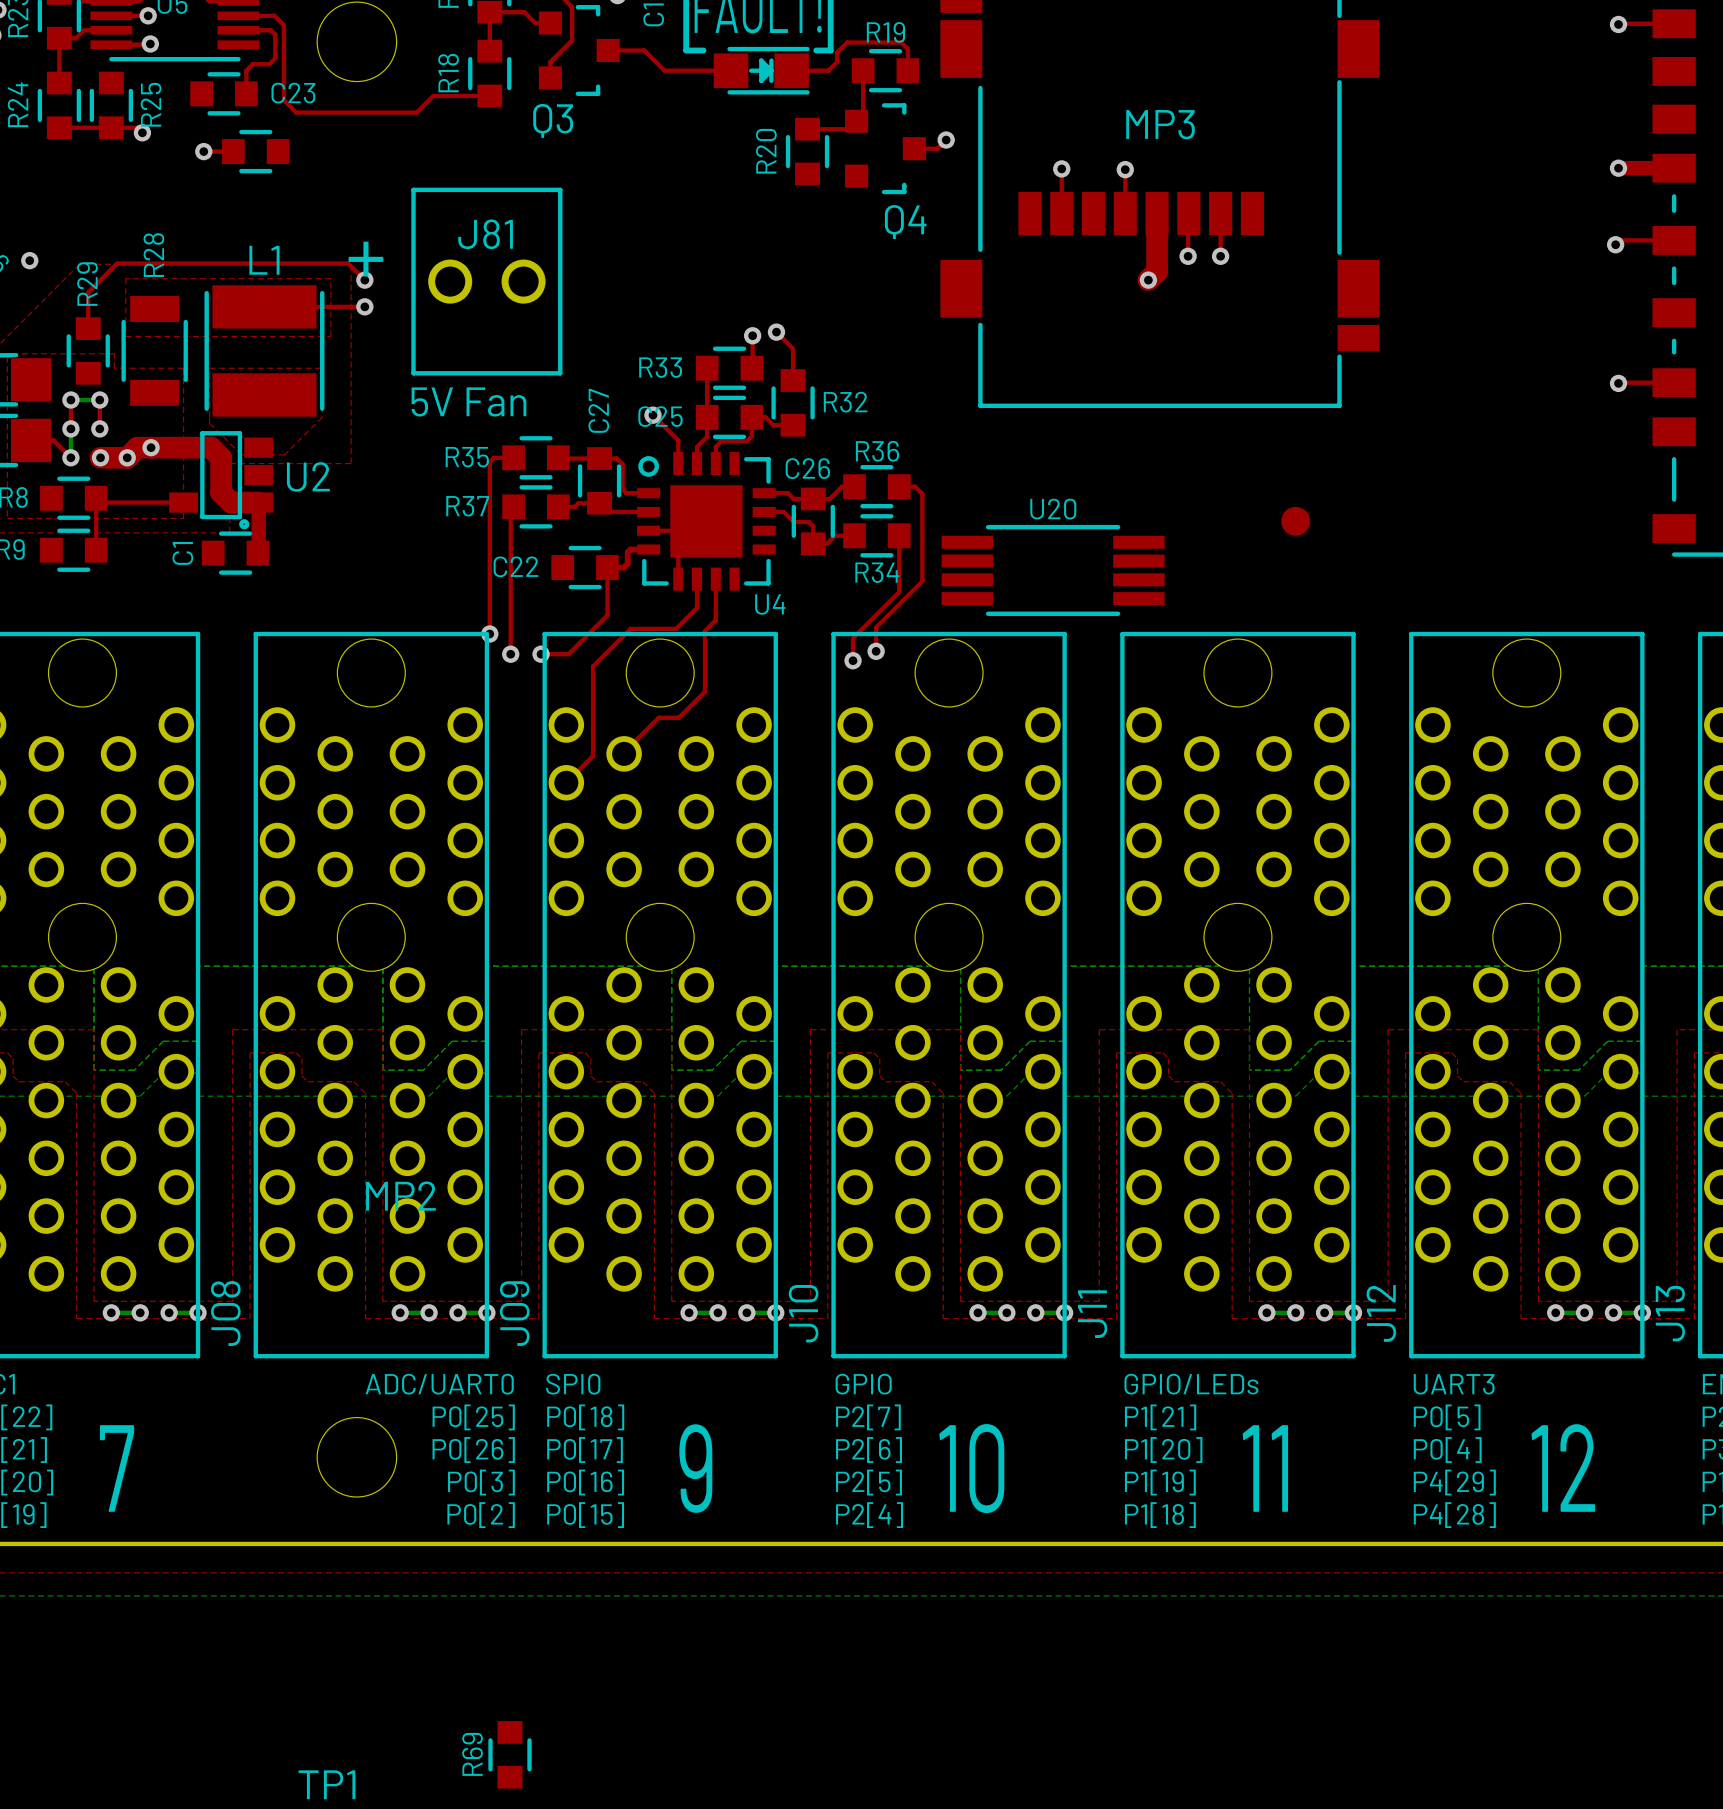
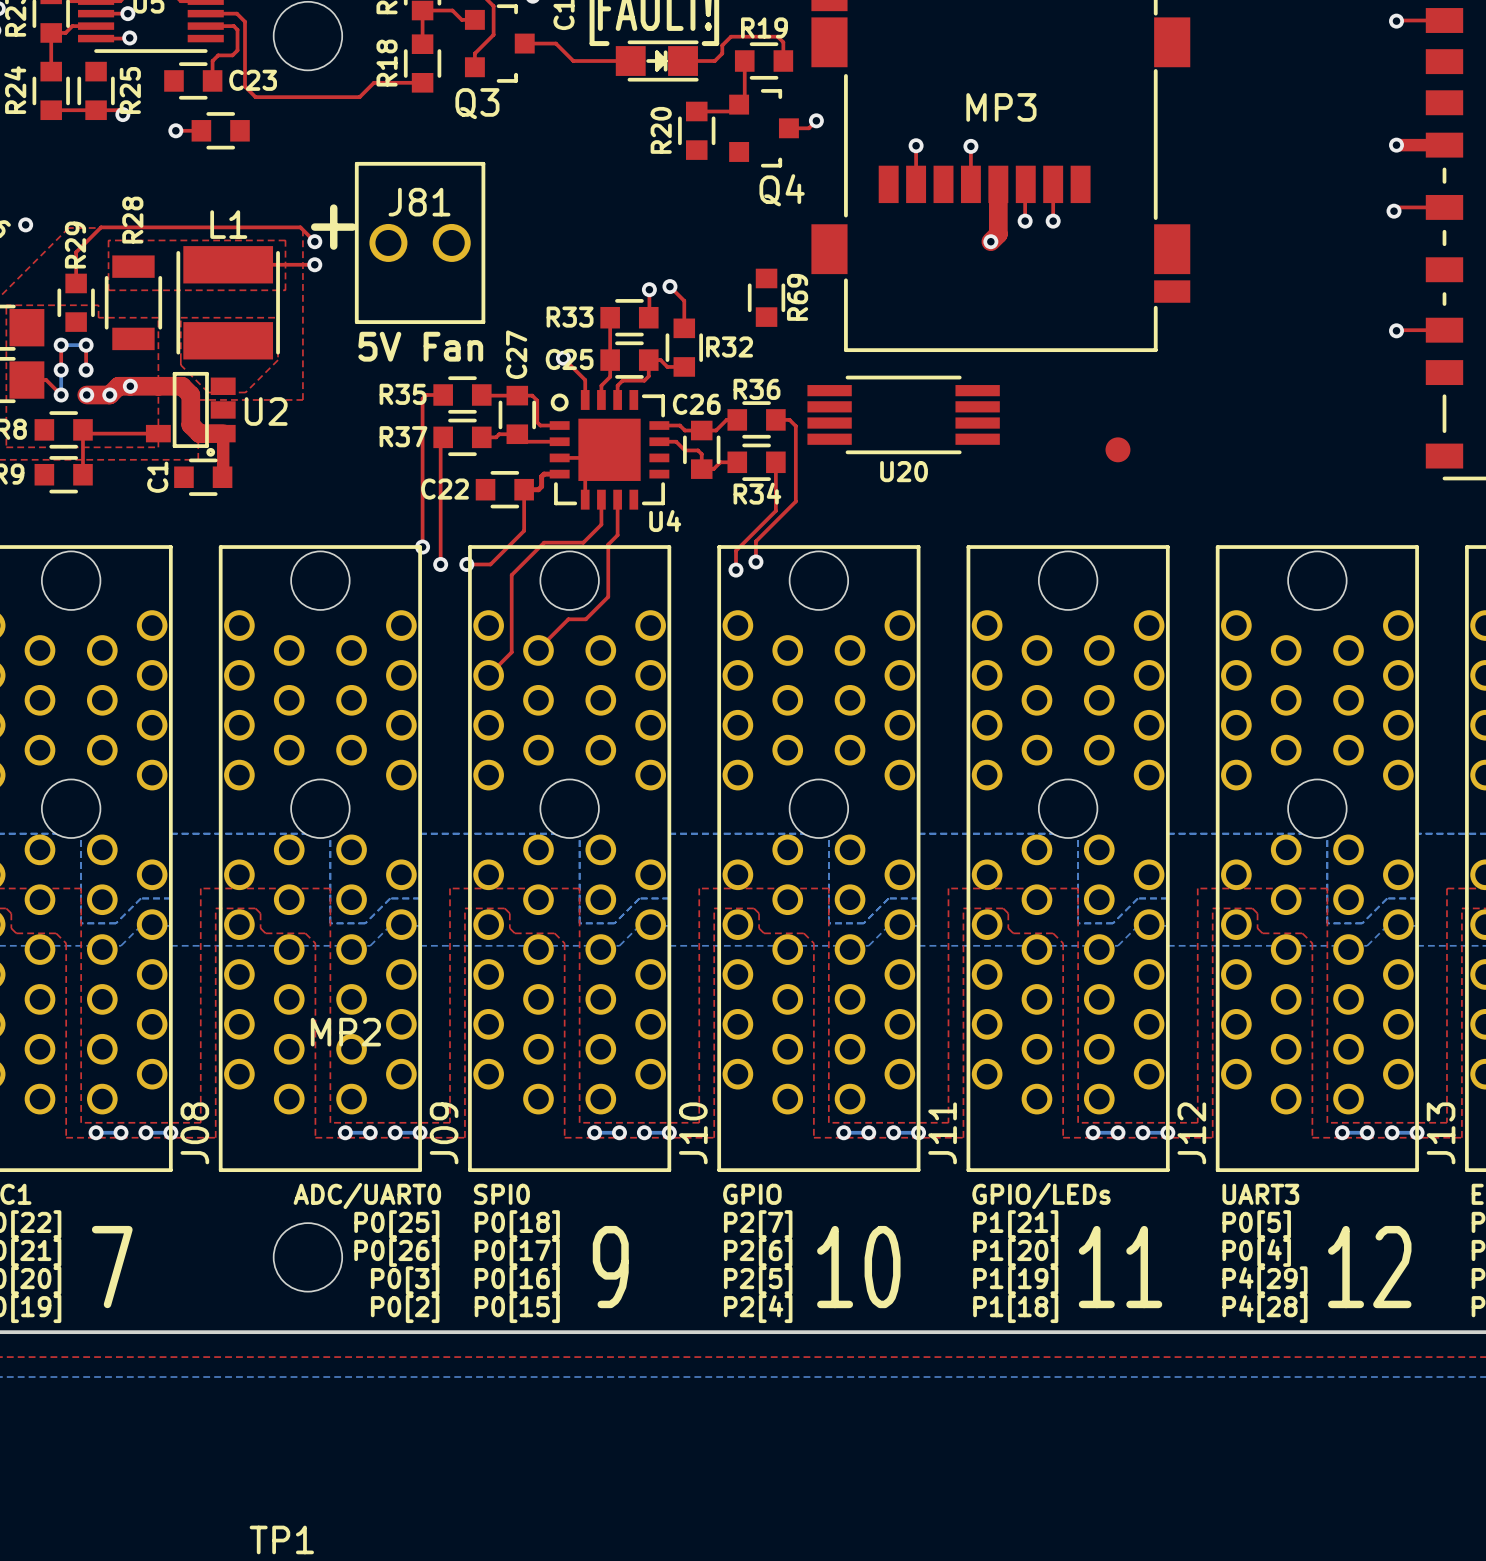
U20 name position: U20 (1053, 509) -> U20 (904, 471)
U20 position: (1053, 570) -> (903, 414)
R69 name position: R69 (472, 1754) -> R69 (797, 297)
R69 position: (509, 1754) -> (766, 297)

